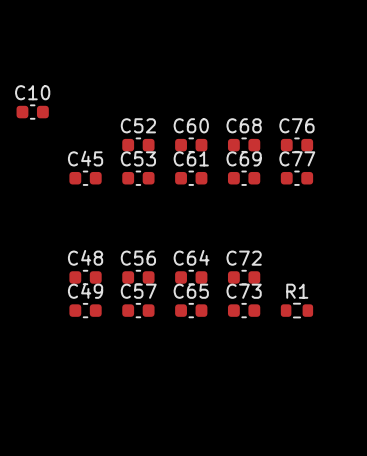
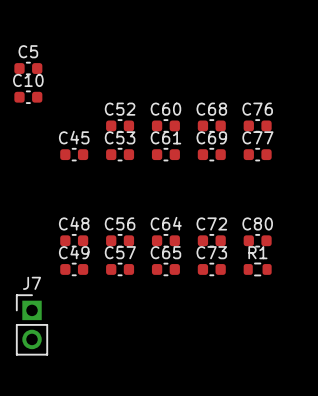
C5: none -> (28, 68)
C80: none -> (257, 240)
J7: none -> (32, 324)

